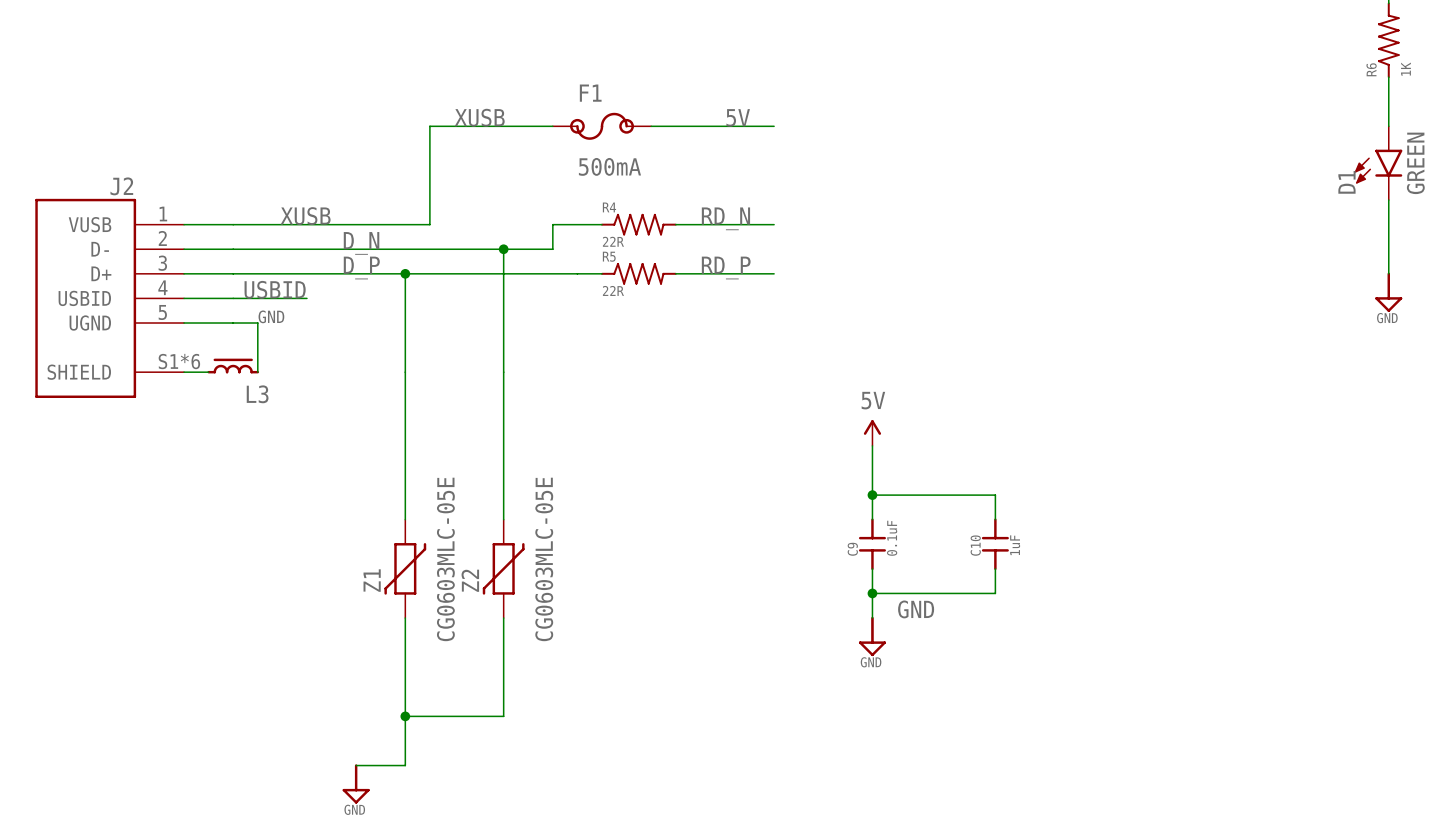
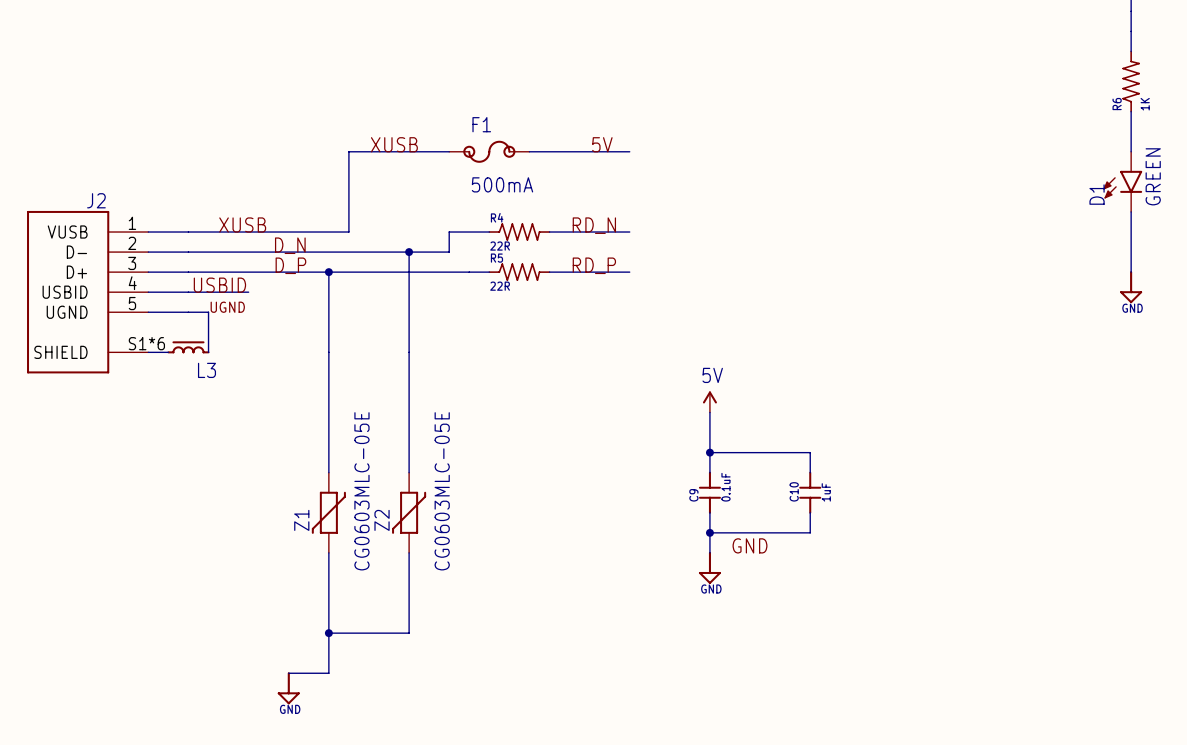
label: GND (271, 316) -> UGND (227, 307)

